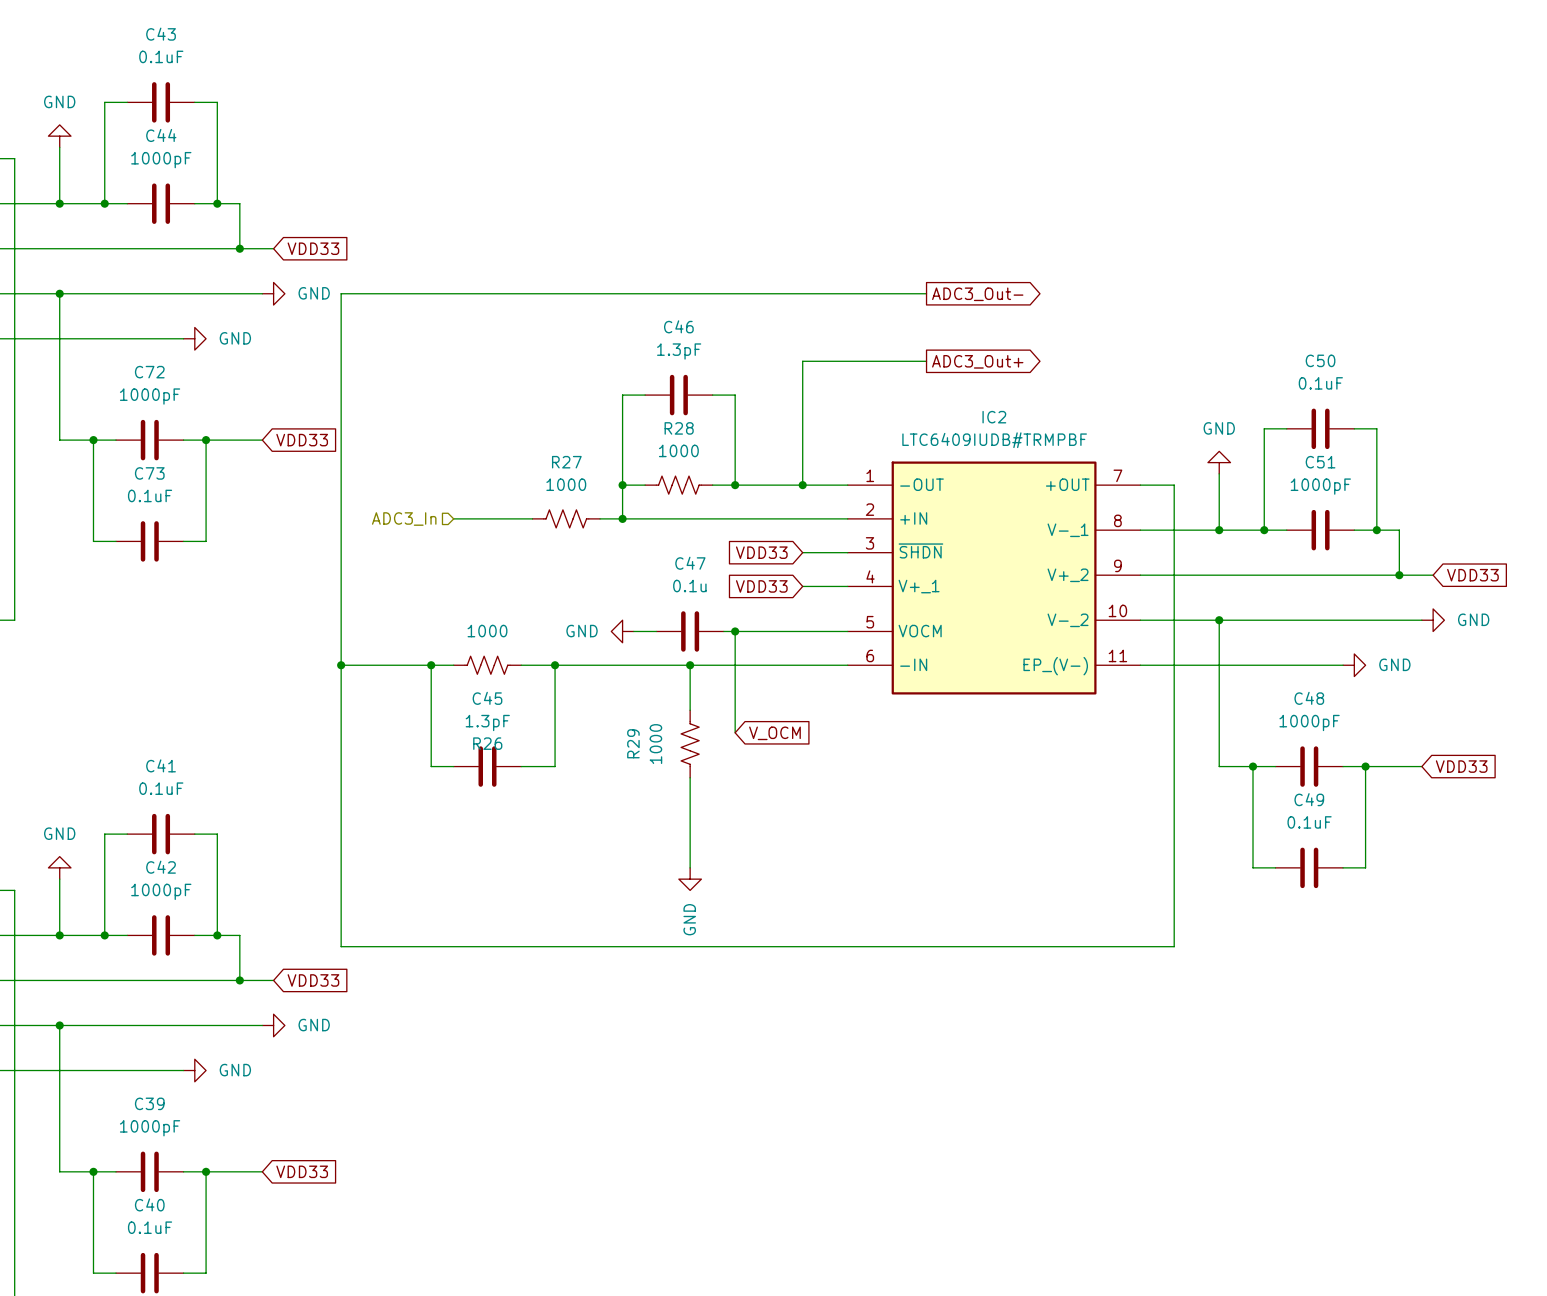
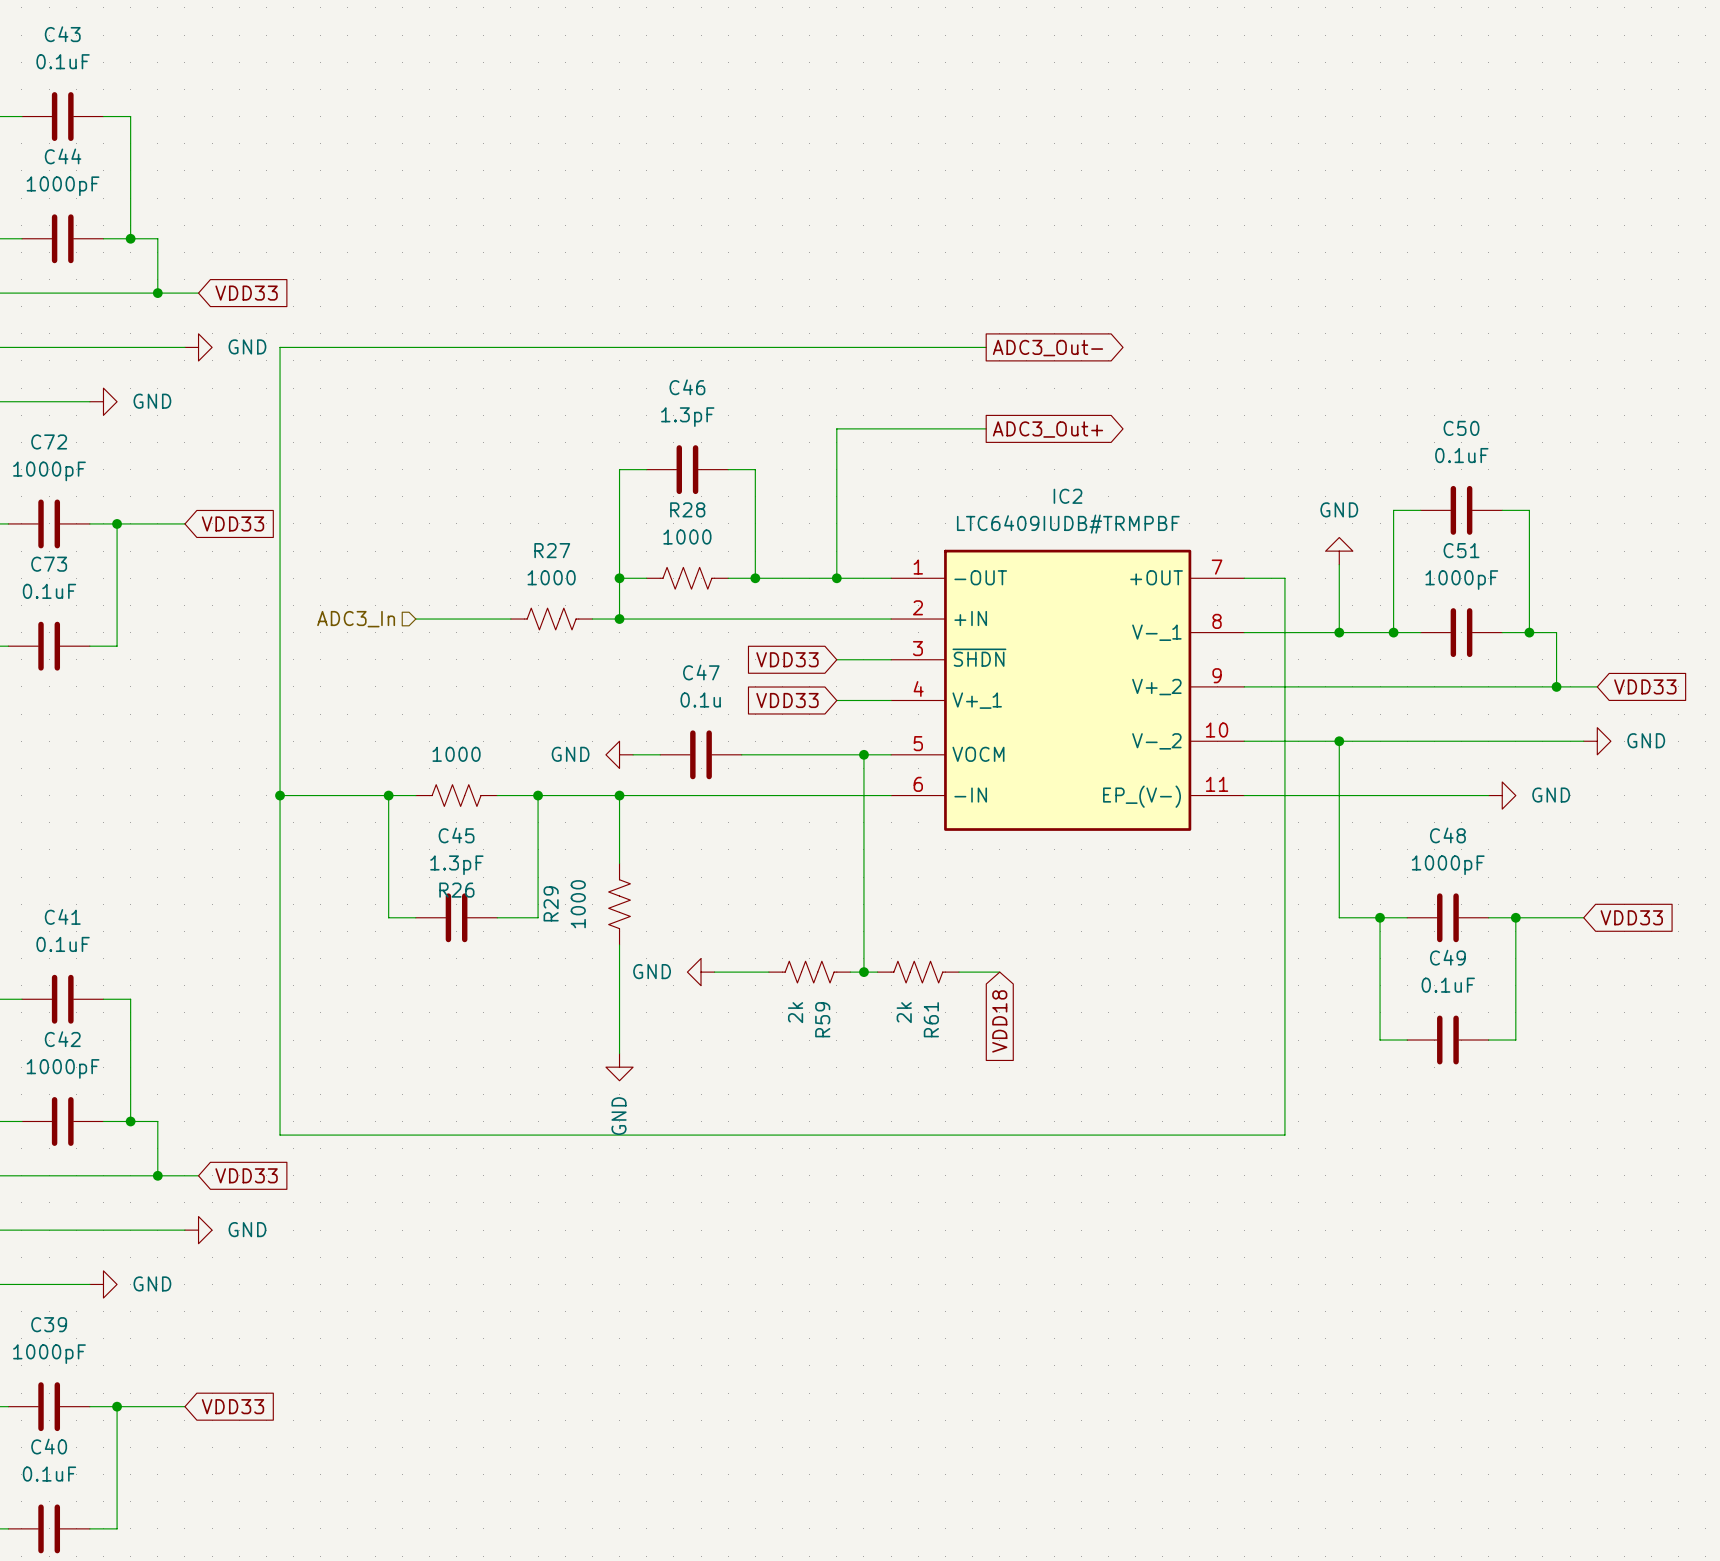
wire: (735, 631) (735, 732) -> none
junction: (735, 631) -> none
wire: none -> (863, 754) (863, 972)
junction: none -> (863, 754)
wire: none -> (619, 795) (619, 863)
junction: none -> (619, 795)
wire: (690, 665) (690, 710) -> none
junction: (690, 665) -> none
global label: V_OCM (774, 733) -> none
R29 position: (690, 744) -> (619, 904)
wire: (690, 777) (690, 867) -> (619, 944) (619, 1053)
power symbol: none -> GND (701, 972)
wire: none -> (714, 972) (768, 972)
R59: none -> 2k (809, 972)
wire: none -> (850, 972) (877, 972)
junction: none -> (863, 972)
R61: none -> 2k (918, 972)
wire: none -> (959, 972) (999, 972)
global label: none -> VDD18 (999, 1021)
power symbol: GND (690, 879) -> none
power symbol: none -> GND (619, 1067)

